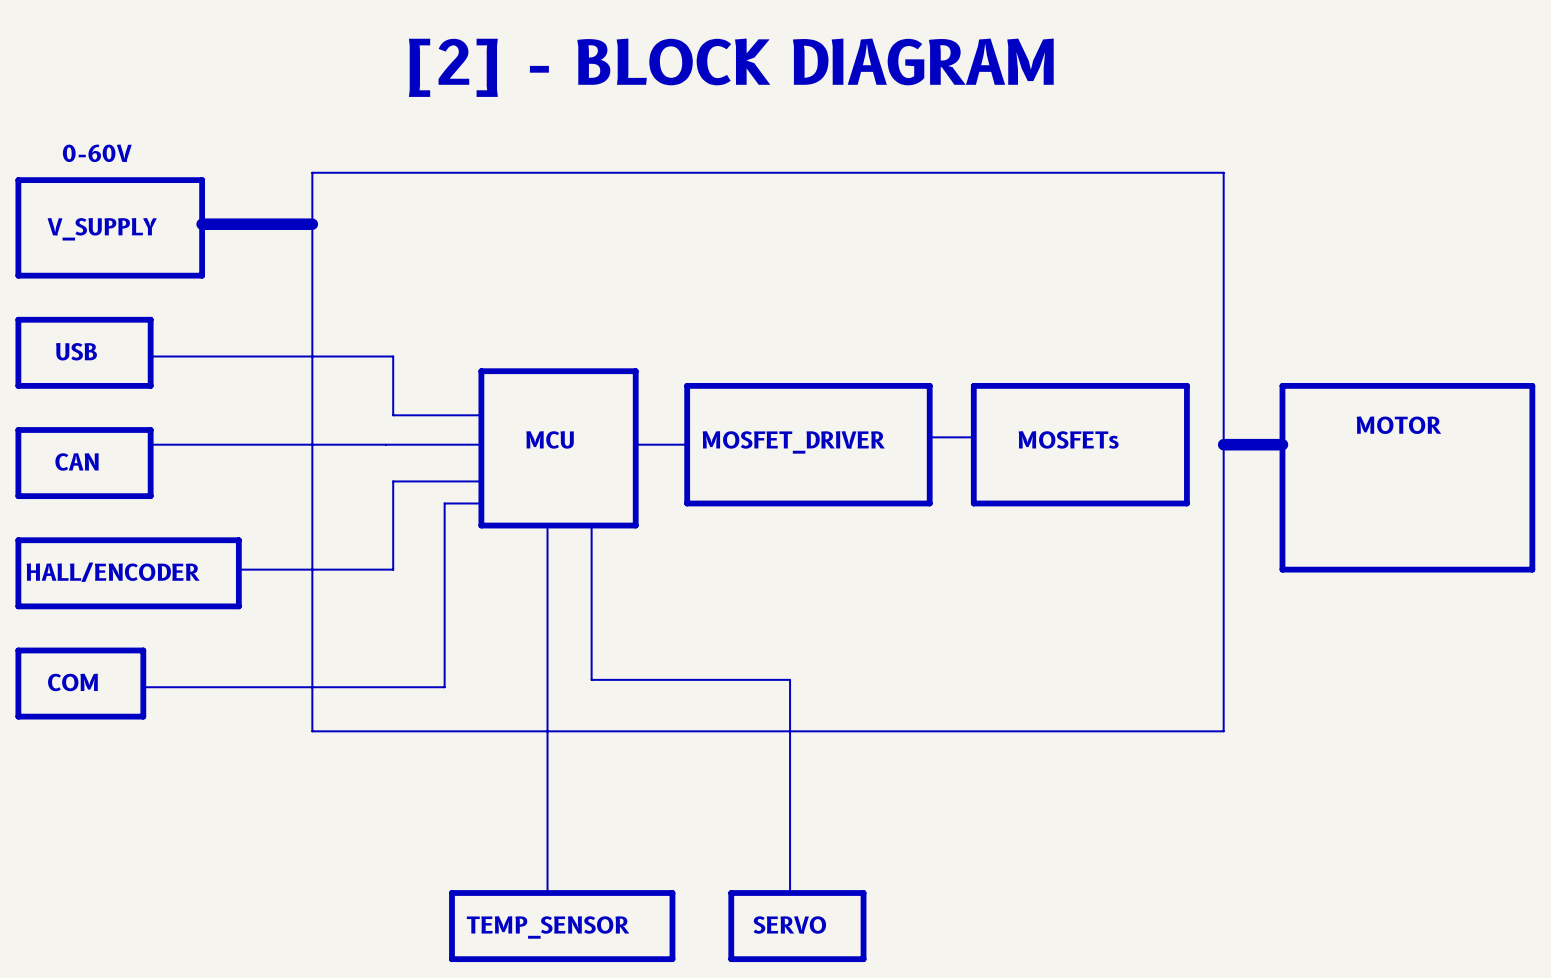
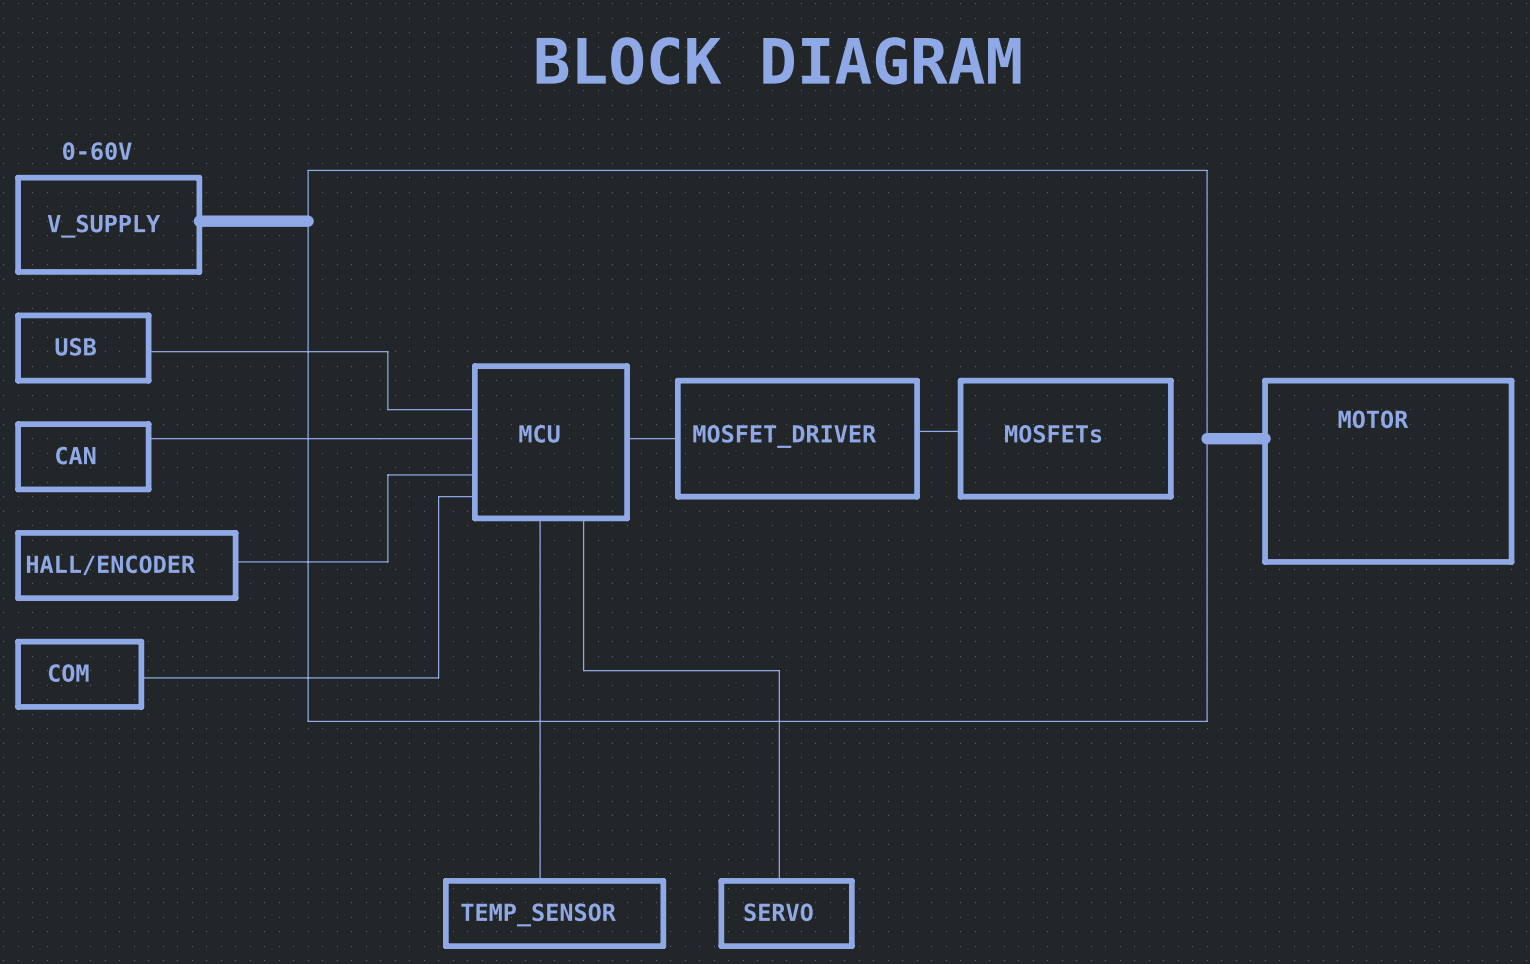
text: [2] - BLOCK DIAGRAM (731, 67) -> BLOCK DIAGRAM (778, 60)

